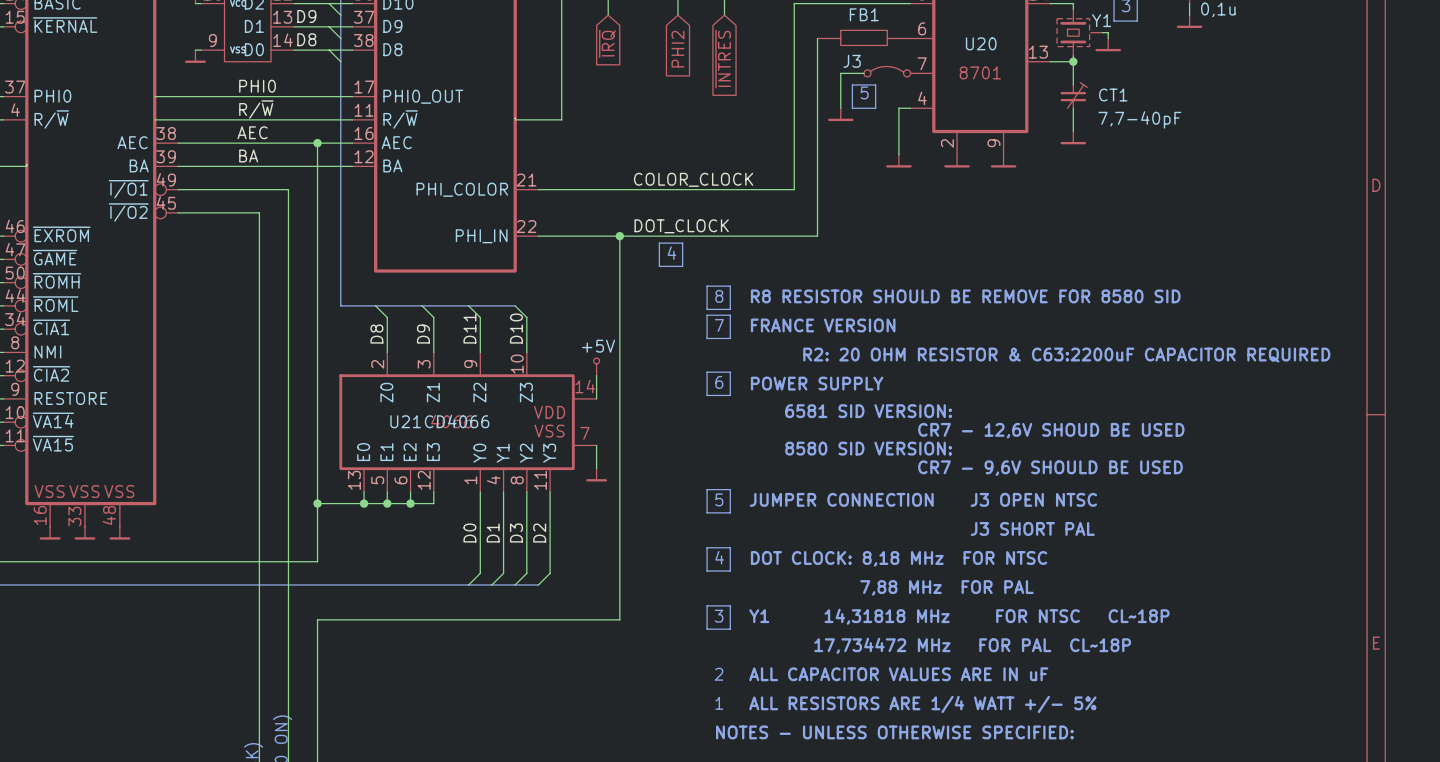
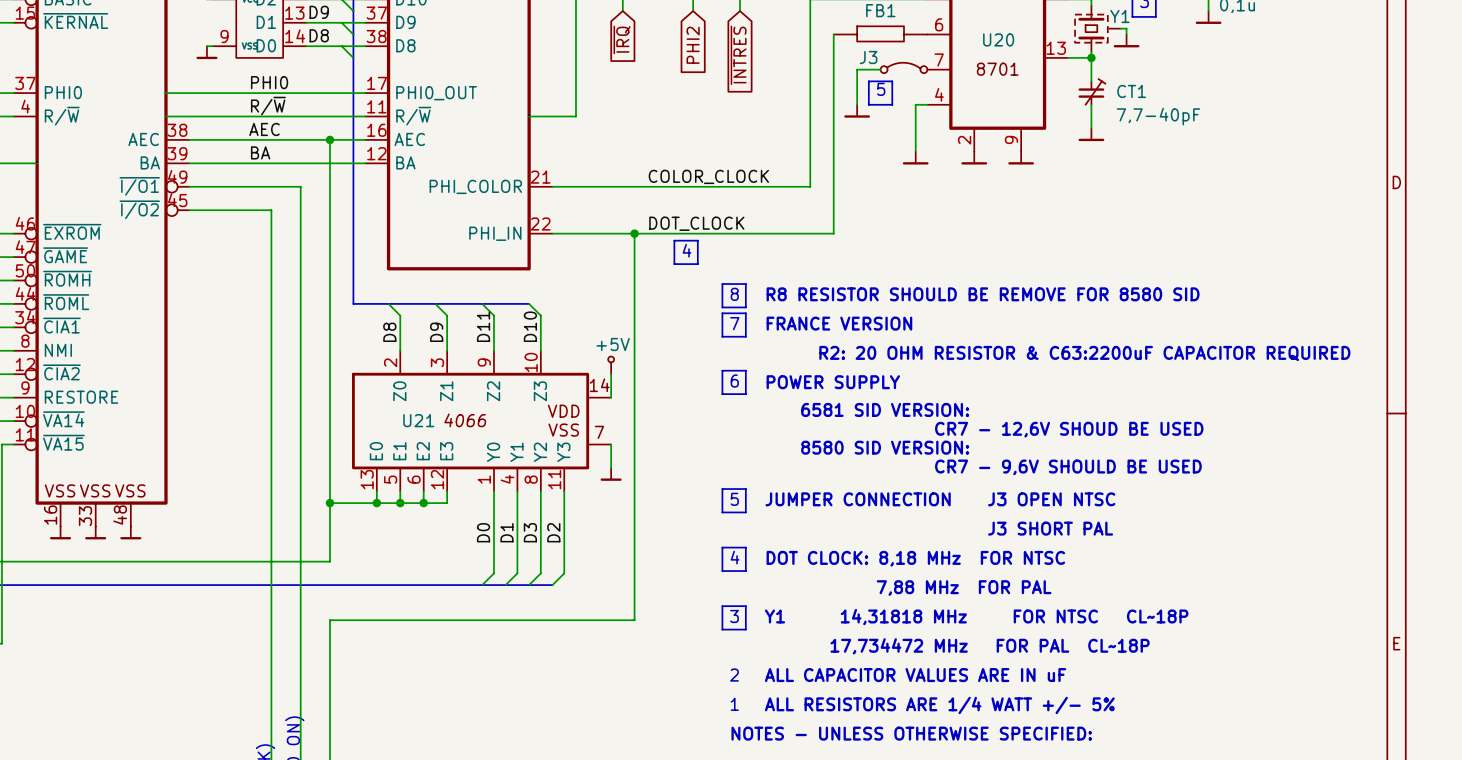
U21 value: CD4066 (457, 421) -> none

